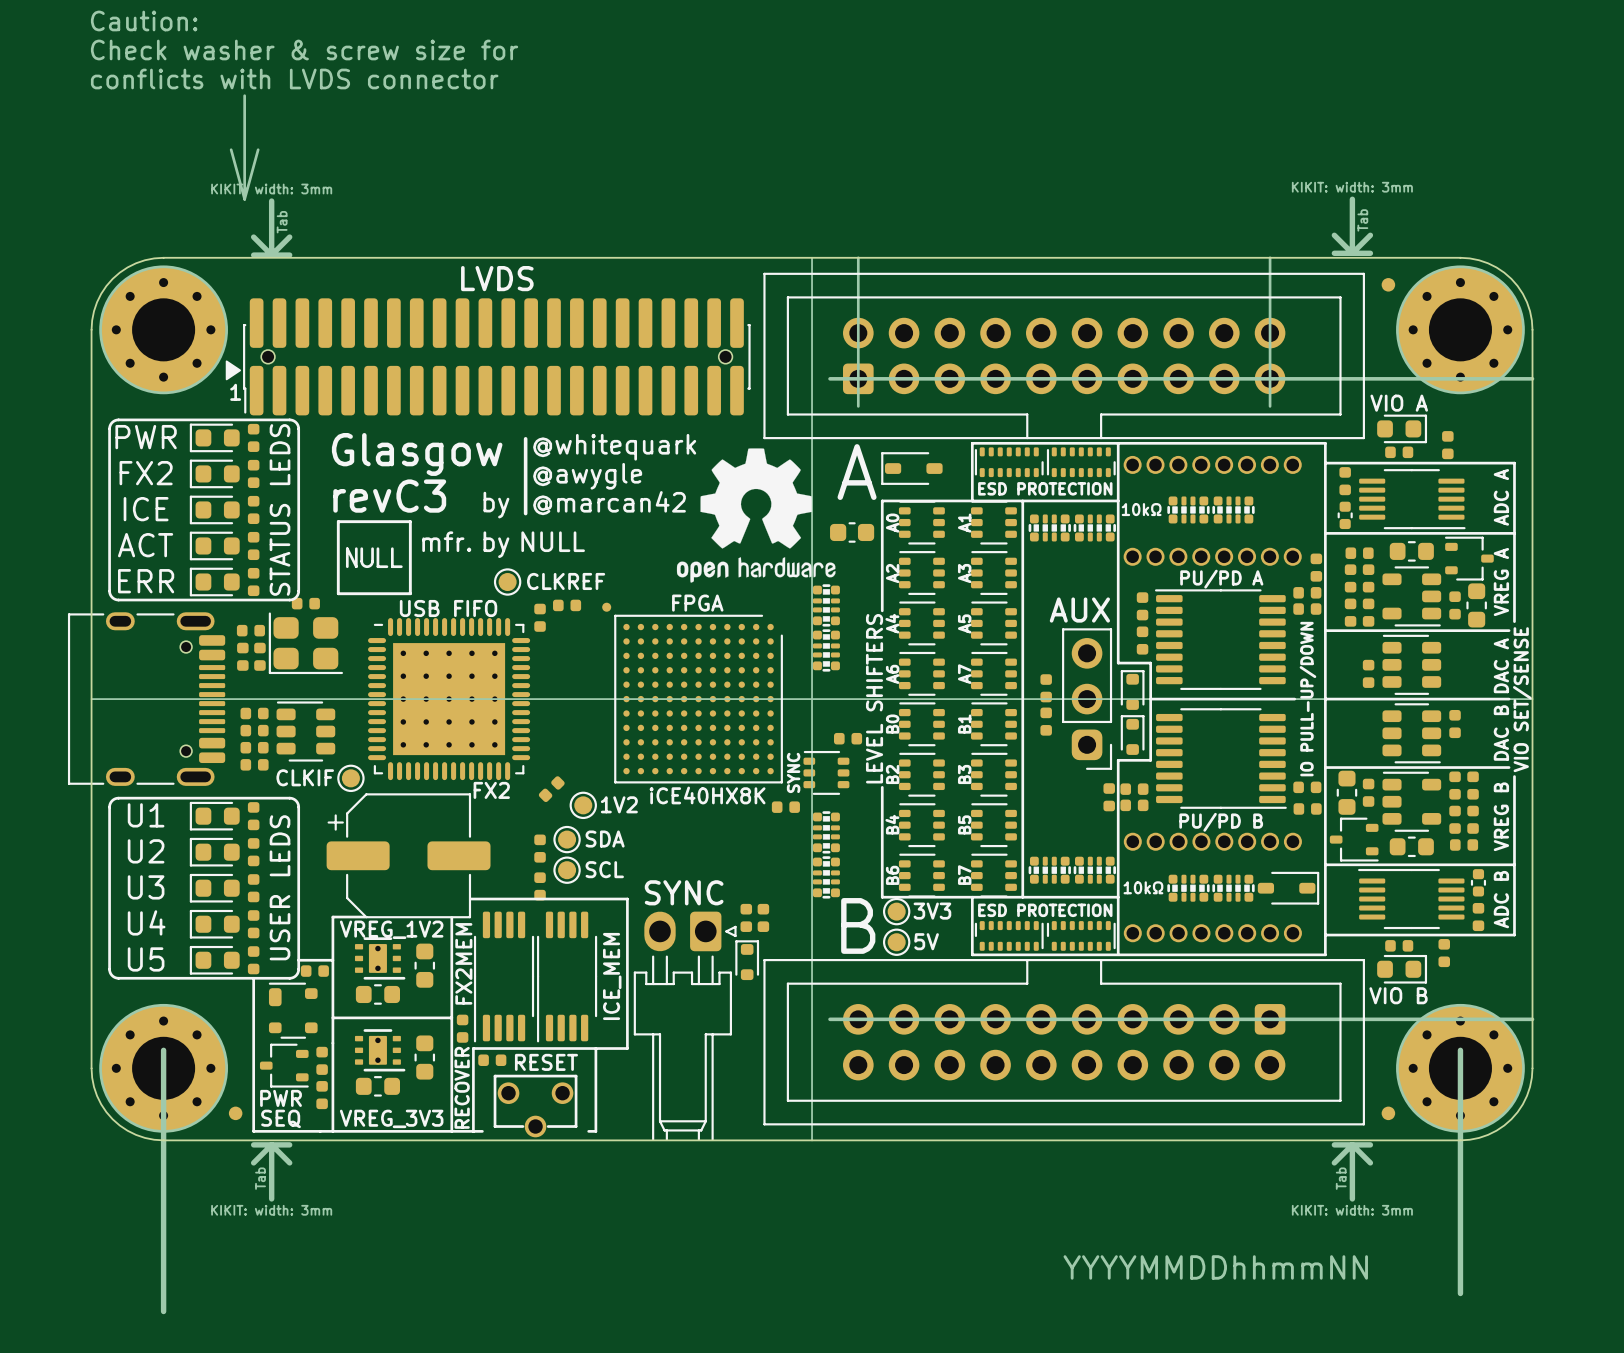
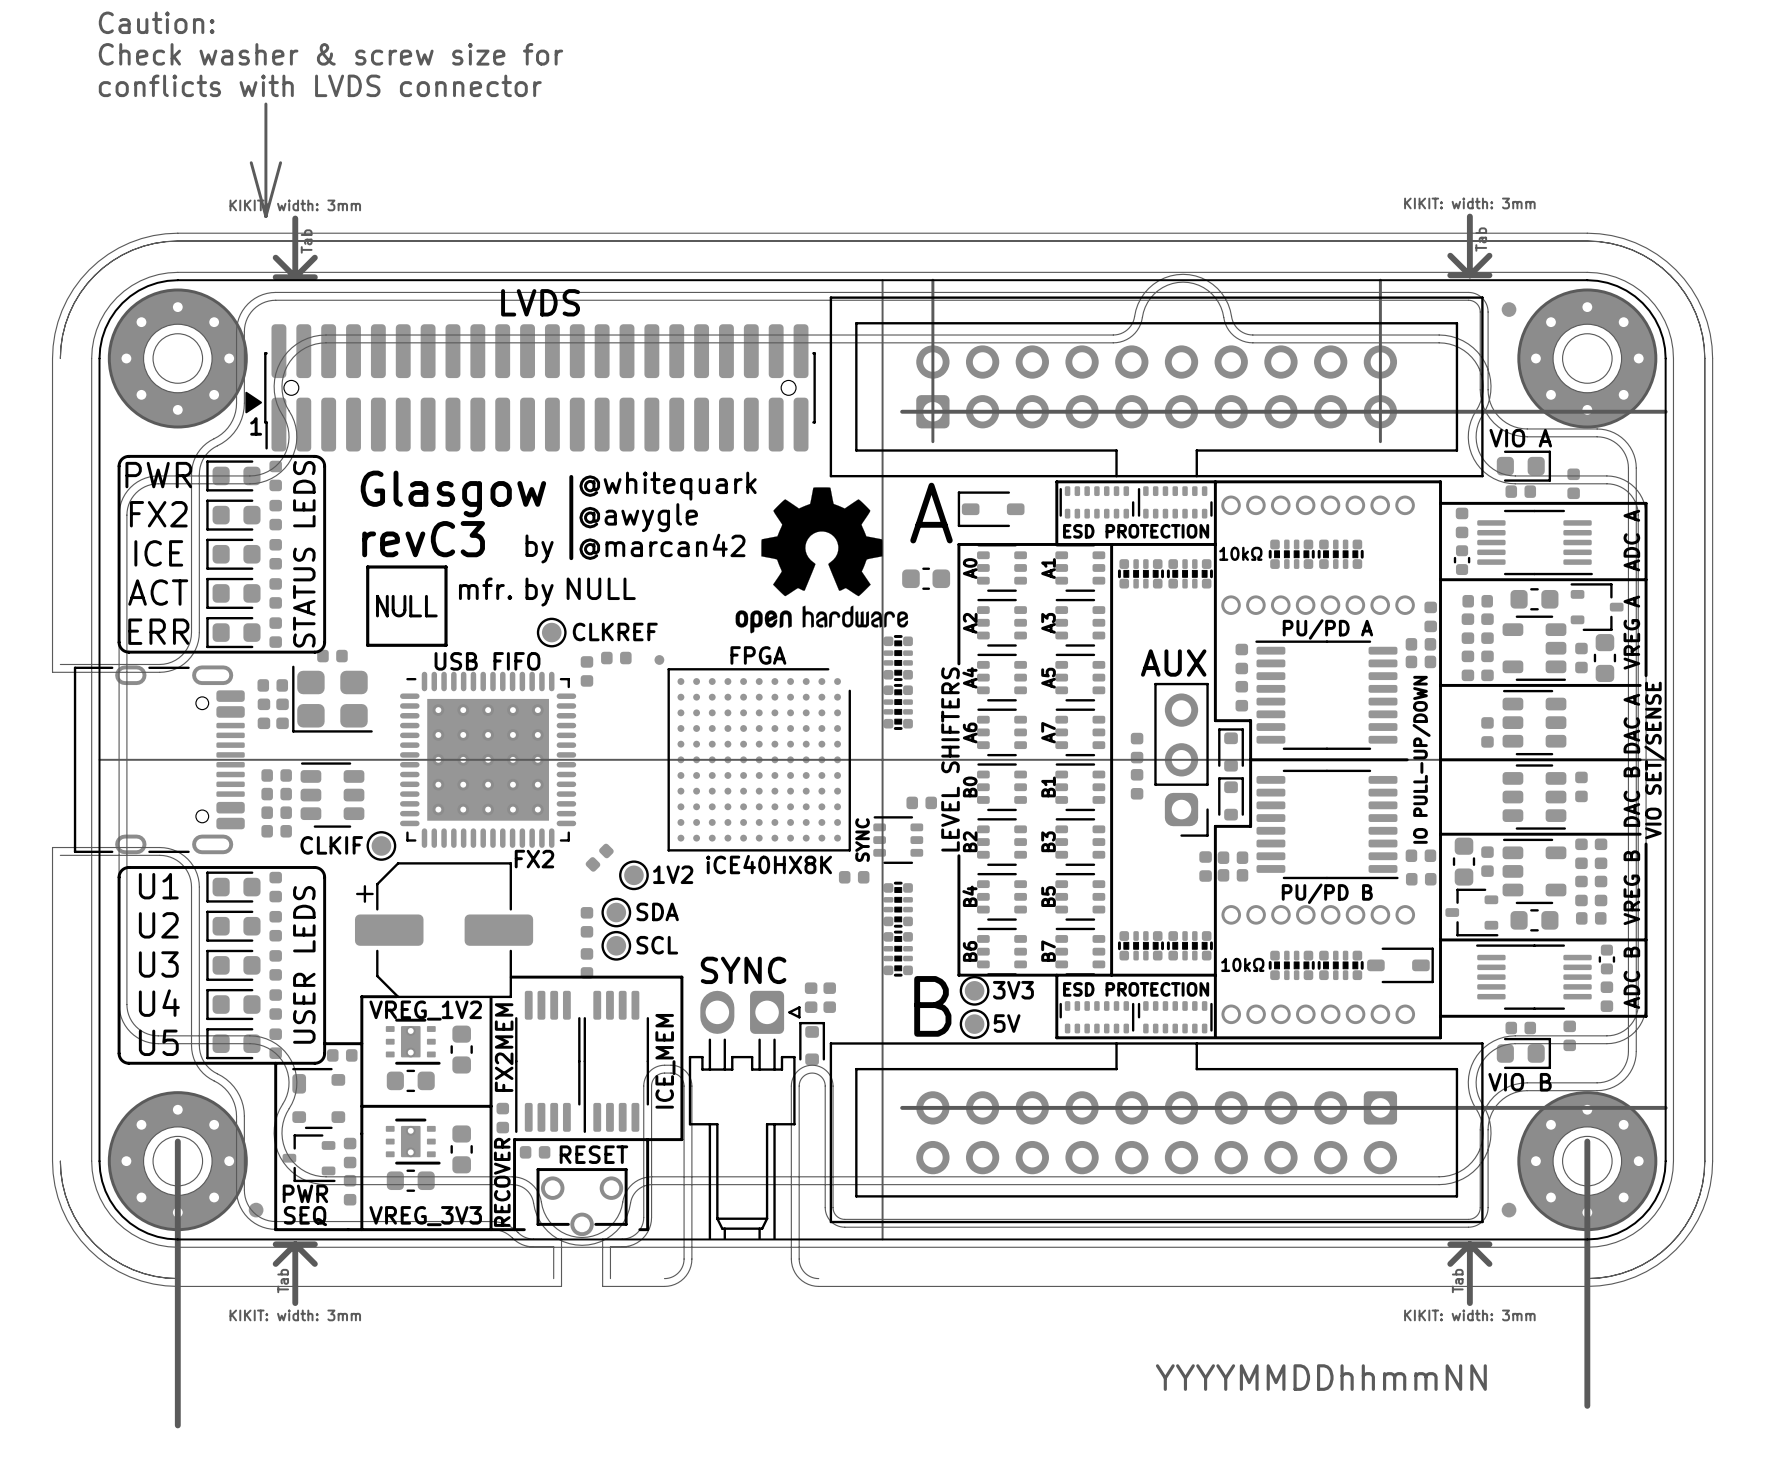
line: none -> (177, 233) (1587, 233) (1623, 238) (1656, 254) (1675, 269) (1697, 299) (1707, 322) (1712, 358) (1712, 1161) (1707, 1197) (1691, 1230) (1666, 1257) (1646, 1271) (1611, 1284) (1587, 1286) (818, 1286) (802, 1280) (792, 1266) (791, 1083) (796, 1072) (807, 1065) (817, 1065) (824, 1068) (832, 1081) (833, 1209) (836, 1215) (844, 1219) (1470, 1219) (1476, 1215) (1480, 1209) (1480, 1123) (1486, 1106) (1494, 1096) (1509, 1086) (1521, 1083) (1604, 1082) (1616, 1076) (1623, 1068) (1628, 1051) (1627, 461) (1619, 445) (1604, 437) (1521, 436) (1503, 430) (1494, 423) (1486, 413) (1480, 395) (1480, 310) (1474, 301) (1468, 300) (268, 301) (253, 309) (245, 324) (244, 403) (241, 418) (230, 436) (206, 454) (200, 467) (199, 632) (193, 653) (180, 666) (164, 672) (52, 672) (52, 358) (57, 322) (73, 288) (98, 261) (129, 242) (153, 235) (177, 233)
line: none -> (177, 241) (1587, 241)
line: none -> (177, 241) (154, 243) (132, 249) (112, 260) (94, 275) (80, 293) (69, 313) (62, 335) (60, 358) (60, 346) (62, 335) (65, 324) (69, 313) (74, 303) (80, 293) (87, 283) (94, 275) (103, 267) (112, 260) (122, 254) (132, 249) (143, 246) (154, 243) (166, 241) (177, 241)
line: none -> (1587, 241) (1610, 243) (1632, 249) (1652, 260) (1670, 275) (1684, 293) (1695, 313) (1702, 335) (1704, 358)
line: none -> (1587, 241) (1610, 243) (1632, 249) (1652, 260) (1670, 275) (1684, 293) (1695, 313) (1702, 335) (1704, 358)
line: none -> (177, 272) (1587, 272) (1615, 277) (1633, 285) (1648, 297) (1660, 312) (1668, 330) (1673, 358) (1673, 1161) (1668, 1189) (1660, 1206) (1648, 1222) (1624, 1238) (1606, 1245) (1587, 1247) (177, 1247) (158, 1245) (131, 1234) (116, 1222) (104, 1206) (96, 1189) (91, 1161) (91, 358) (96, 330) (104, 312) (116, 297) (131, 285) (149, 277) (177, 272)
line: none -> (1134, 316) (1140, 298) (1153, 284) (1170, 275) (1189, 274) (1207, 280) (1217, 288) (1228, 304) (1235, 325) (1247, 334) (1439, 335) (1457, 338) (1477, 352) (1489, 373) (1489, 398) (1478, 423) (1476, 437) (1478, 451) (1489, 466) (1501, 473) (1510, 475) (1615, 476) (1631, 484) (1643, 502) (1646, 515) (1645, 1013) (1634, 1032) (1615, 1042) (1510, 1043) (1501, 1046) (1489, 1053) (1478, 1068) (1476, 1082) (1478, 1095) (1489, 1121) (1490, 1139) (1481, 1162) (1468, 1175) (1451, 1183) (1439, 1184) (649, 1184) (641, 1187) (634, 1193) (624, 1221) (611, 1235) (594, 1243) (575, 1244) (563, 1241) (547, 1231) (536, 1215) (529, 1193) (517, 1185) (326, 1184) (302, 1178) (283, 1162) (275, 1145) (275, 1121) (286, 1095) (289, 1082) (284, 1064) (275, 1053) (267, 1048) (254, 1043) (149, 1042) (137, 1037) (125, 1025) (119, 1004) (120, 506) (130, 487) (149, 476) (254, 475) (267, 471) (275, 466) (284, 455) (289, 437) (286, 423) (275, 398) (274, 379) (280, 362) (296, 344) (307, 338) (326, 335) (1113, 335) (1127, 329) (1134, 316)
line: none -> (1142, 317) (1139, 327) (1132, 335) (1123, 340) (1113, 342) (326, 342) (310, 345) (301, 350) (290, 361) (282, 380) (283, 396) (294, 421) (296, 437) (291, 459) (280, 472) (266, 480) (255, 483) (151, 484) (136, 492) (127, 508) (126, 1004) (131, 1021) (141, 1031) (151, 1035) (255, 1036) (266, 1038) (280, 1047) (291, 1060) (296, 1082) (294, 1098) (283, 1123) (283, 1143) (290, 1158) (305, 1171) (326, 1176) (519, 1177) (528, 1181) (536, 1189) (544, 1212) (553, 1225) (561, 1232) (576, 1237) (592, 1236) (606, 1229) (617, 1217) (627, 1189) (638, 1180) (648, 1177) (1439, 1176) (1454, 1174) (1463, 1169) (1475, 1158) (1482, 1138) (1482, 1123) (1470, 1098) (1468, 1082) (1473, 1060) (1484, 1047) (1498, 1038) (1509, 1036) (1613, 1035) (1629, 1026) (1637, 1011) (1638, 515) (1636, 504) (1626, 490) (1613, 484) (1509, 483) (1493, 478) (1484, 472) (1471, 454) (1468, 437) (1470, 421) (1482, 396) (1481, 375) (1471, 357) (1454, 345) (1439, 342) (1245, 342) (1236, 337) (1228, 330) (1220, 307) (1212, 294) (1203, 287) (1188, 282) (1172, 283) (1158, 290) (1147, 302) (1142, 317)
drawing: none -> [143, 324, 213, 393]
drawing: none -> [1552, 324, 1622, 393]
line: none -> (1704, 358) (1704, 1161)
line: none -> (60, 664) (163, 664) (175, 660) (187, 648) (191, 632) (192, 465) (200, 449) (224, 431) (232, 420) (236, 403) (237, 322) (248, 303) (266, 293) (1468, 292) (1480, 296) (1487, 309) (1488, 394) (1491, 406) (1499, 417) (1510, 425) (1522, 428) (1597, 428) (1610, 431) (1627, 443) (1635, 459) (1636, 1051) (1630, 1072) (1617, 1084) (1605, 1089) (1522, 1090) (1510, 1094) (1499, 1102) (1491, 1112) (1488, 1125) (1487, 1211) (1480, 1222) (1468, 1227) (840, 1226) (830, 1221) (825, 1209) (824, 1082) (819, 1075) (809, 1073) (802, 1077) (799, 1086) (799, 1259) (804, 1272) (818, 1278)
line: none -> (52, 847) (53, 1173) (57, 1197) (67, 1220) (80, 1240) (98, 1257) (129, 1276) (165, 1285) (561, 1286) (561, 1239) (527, 1238) (509, 1226) (498, 1222) (275, 1221) (265, 1219) (256, 1214) (249, 1206) (244, 1193) (244, 1116) (241, 1100) (230, 1082) (206, 1065) (200, 1052) (199, 887) (193, 866) (180, 853) (164, 847) (52, 847)
line: none -> (60, 855) (163, 855) (179, 862) (188, 873) (191, 887) (192, 1054) (200, 1070) (224, 1088) (234, 1103) (236, 1116) (236, 1194) (240, 1207) (251, 1220) (262, 1227) (275, 1229) (497, 1229) (524, 1245) (553, 1246) (553, 1278)
line: none -> (664, 1065) (681, 1068) (689, 1075) (691, 1083) (690, 1266) (683, 1278) (671, 1285) (602, 1286) (602, 1239) (630, 1237) (637, 1232) (643, 1223) (643, 1083) (645, 1077) (651, 1069) (664, 1065)
drawing: none -> [143, 1126, 213, 1196]
drawing: none -> [1552, 1126, 1622, 1196]
line: none -> (60, 1161) (62, 1184) (69, 1206) (80, 1226) (94, 1244) (112, 1258) (132, 1269) (154, 1276) (177, 1278) (166, 1278) (154, 1276) (143, 1273) (132, 1269) (122, 1264) (112, 1258) (103, 1251) (94, 1244) (87, 1235) (80, 1226) (74, 1216) (69, 1206) (65, 1195) (62, 1184) (60, 1172) (60, 1161)
line: none -> (1704, 1161) (1702, 1184) (1695, 1206) (1684, 1226) (1670, 1244) (1652, 1258) (1632, 1269) (1610, 1276) (1587, 1278) (1598, 1278) (1610, 1276) (1621, 1273) (1632, 1269) (1642, 1264) (1652, 1258) (1661, 1251) (1670, 1244) (1678, 1235) (1684, 1226) (1690, 1216) (1695, 1206) (1699, 1195) (1702, 1184) (1704, 1172) (1704, 1161)
line: none -> (610, 1278) (610, 1246) (626, 1246) (636, 1242) (645, 1235) (650, 1225) (651, 1084) (657, 1075) (671, 1073) (678, 1075) (683, 1084) (684, 1259) (678, 1272) (664, 1278)

